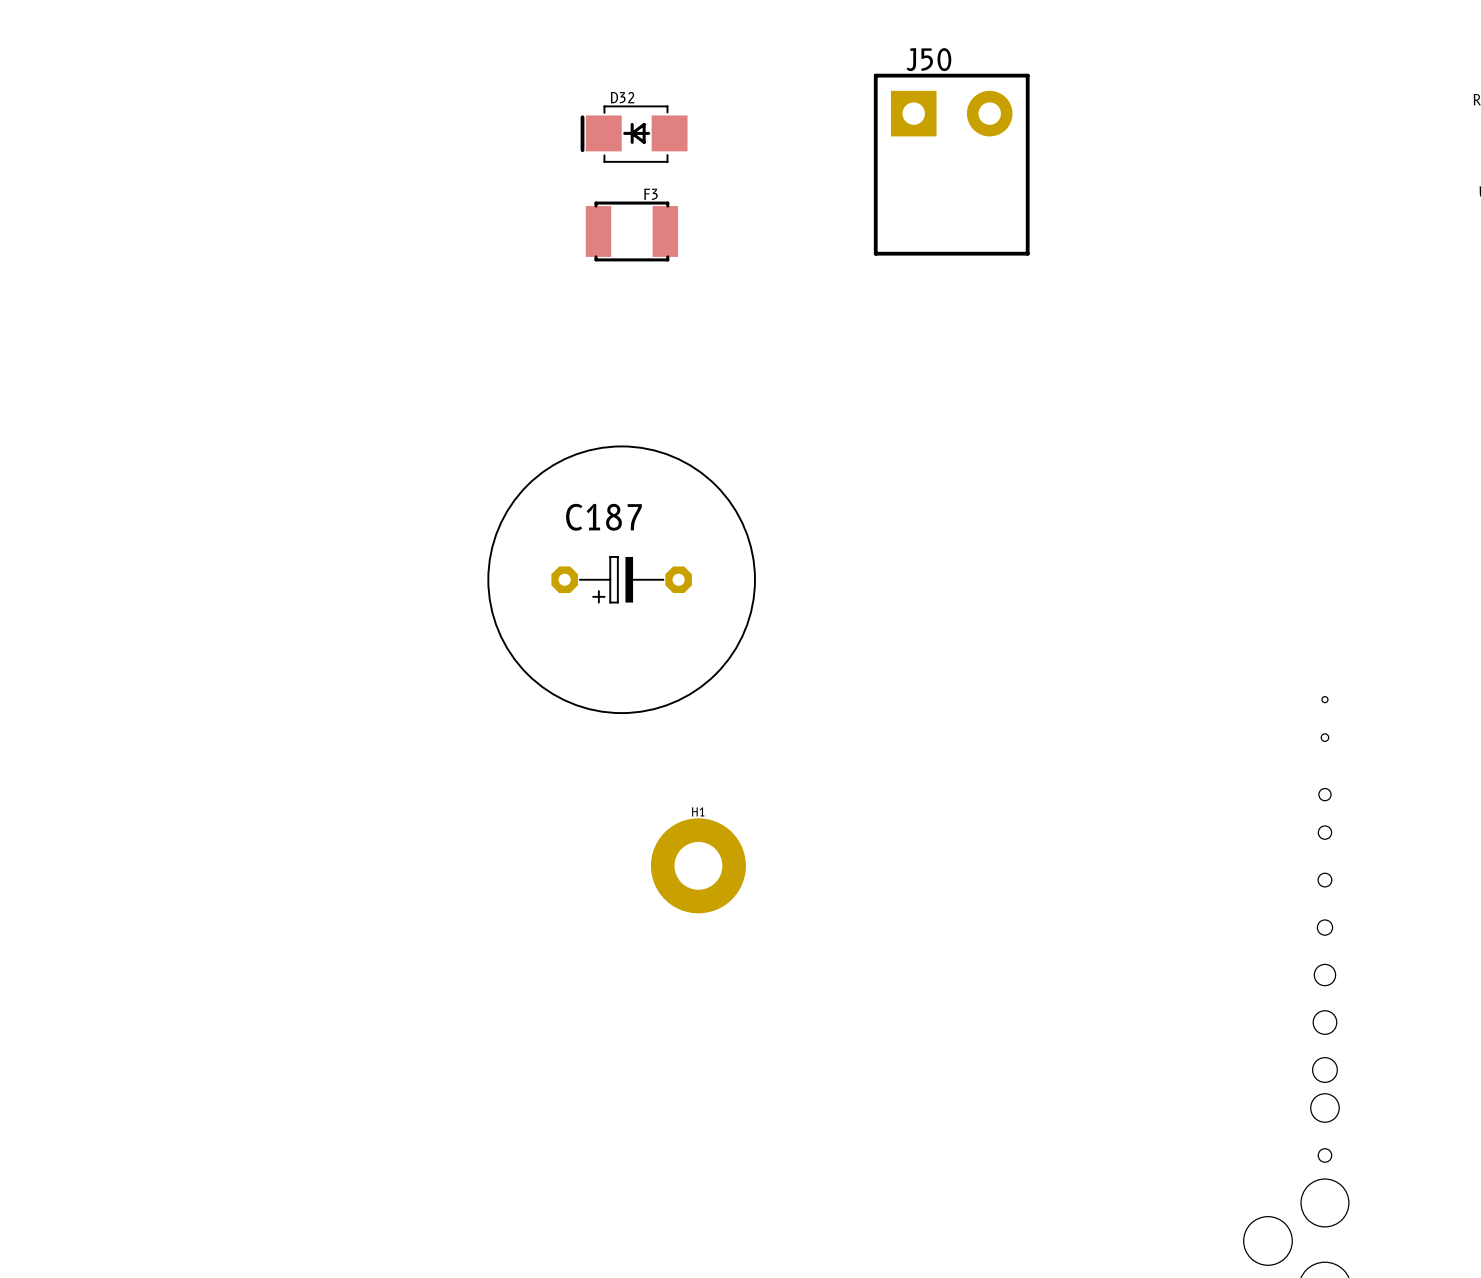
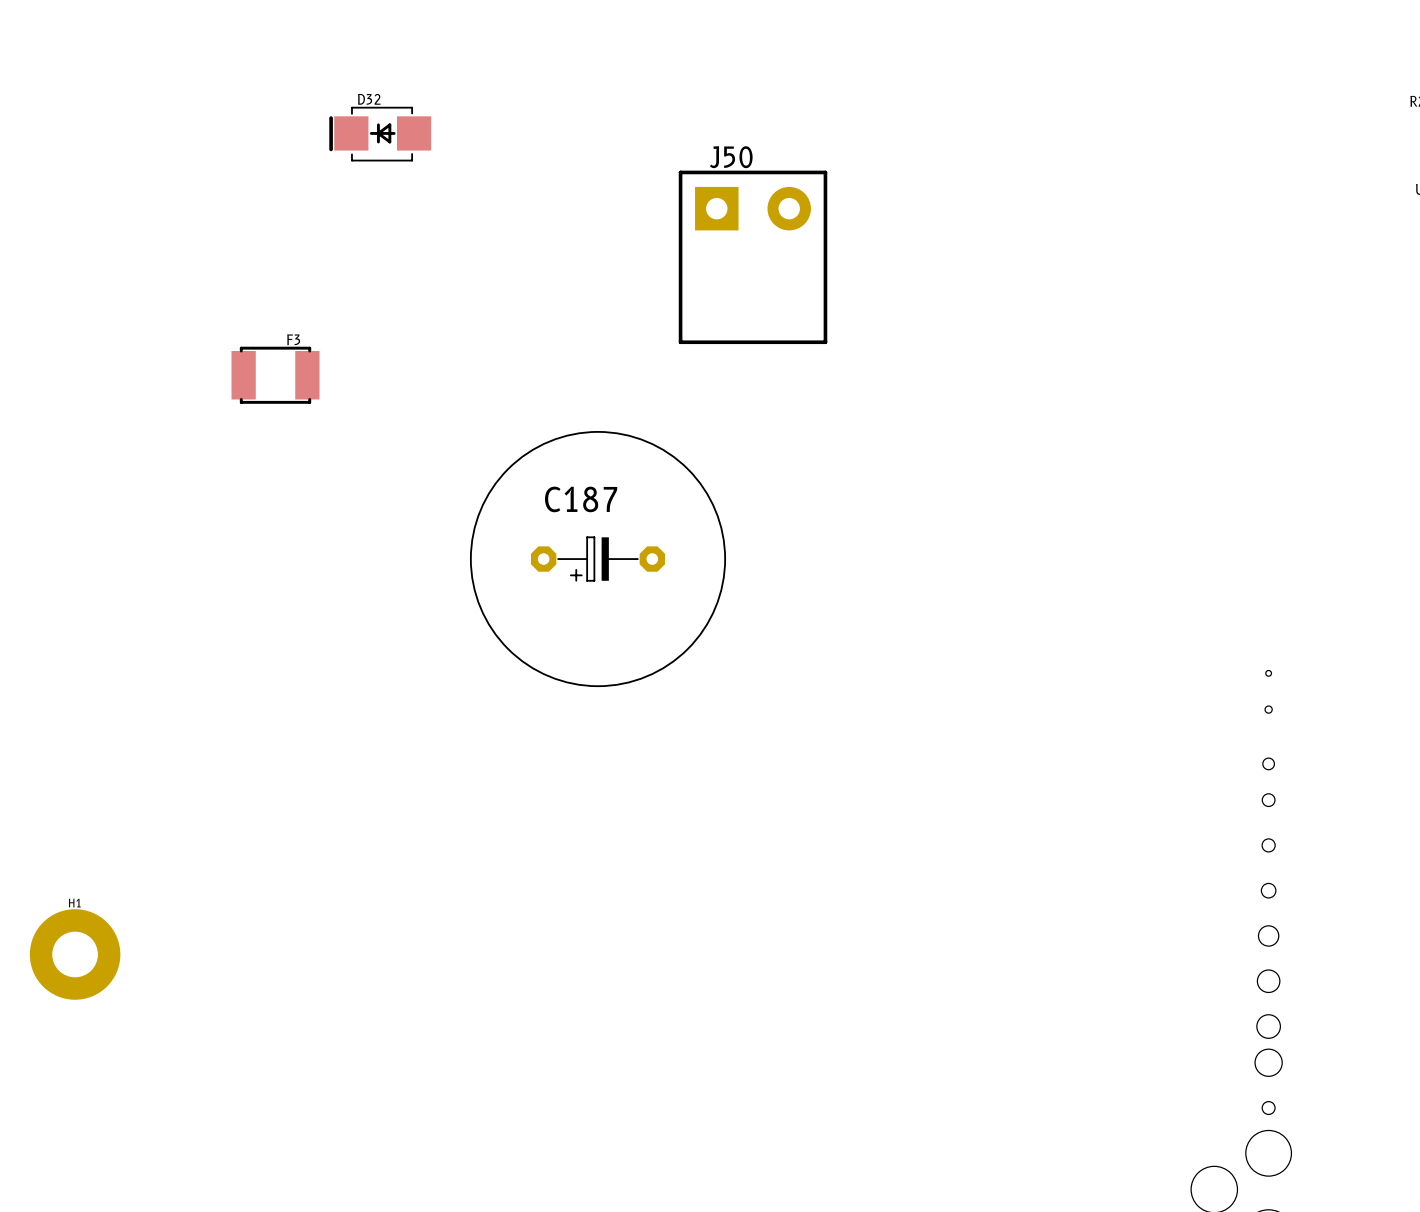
D32 position: (634, 134) -> (380, 134)
J50 position: (951, 164) -> (753, 257)
F3 position: (631, 231) -> (275, 375)
H1 position: (698, 865) -> (75, 954)

